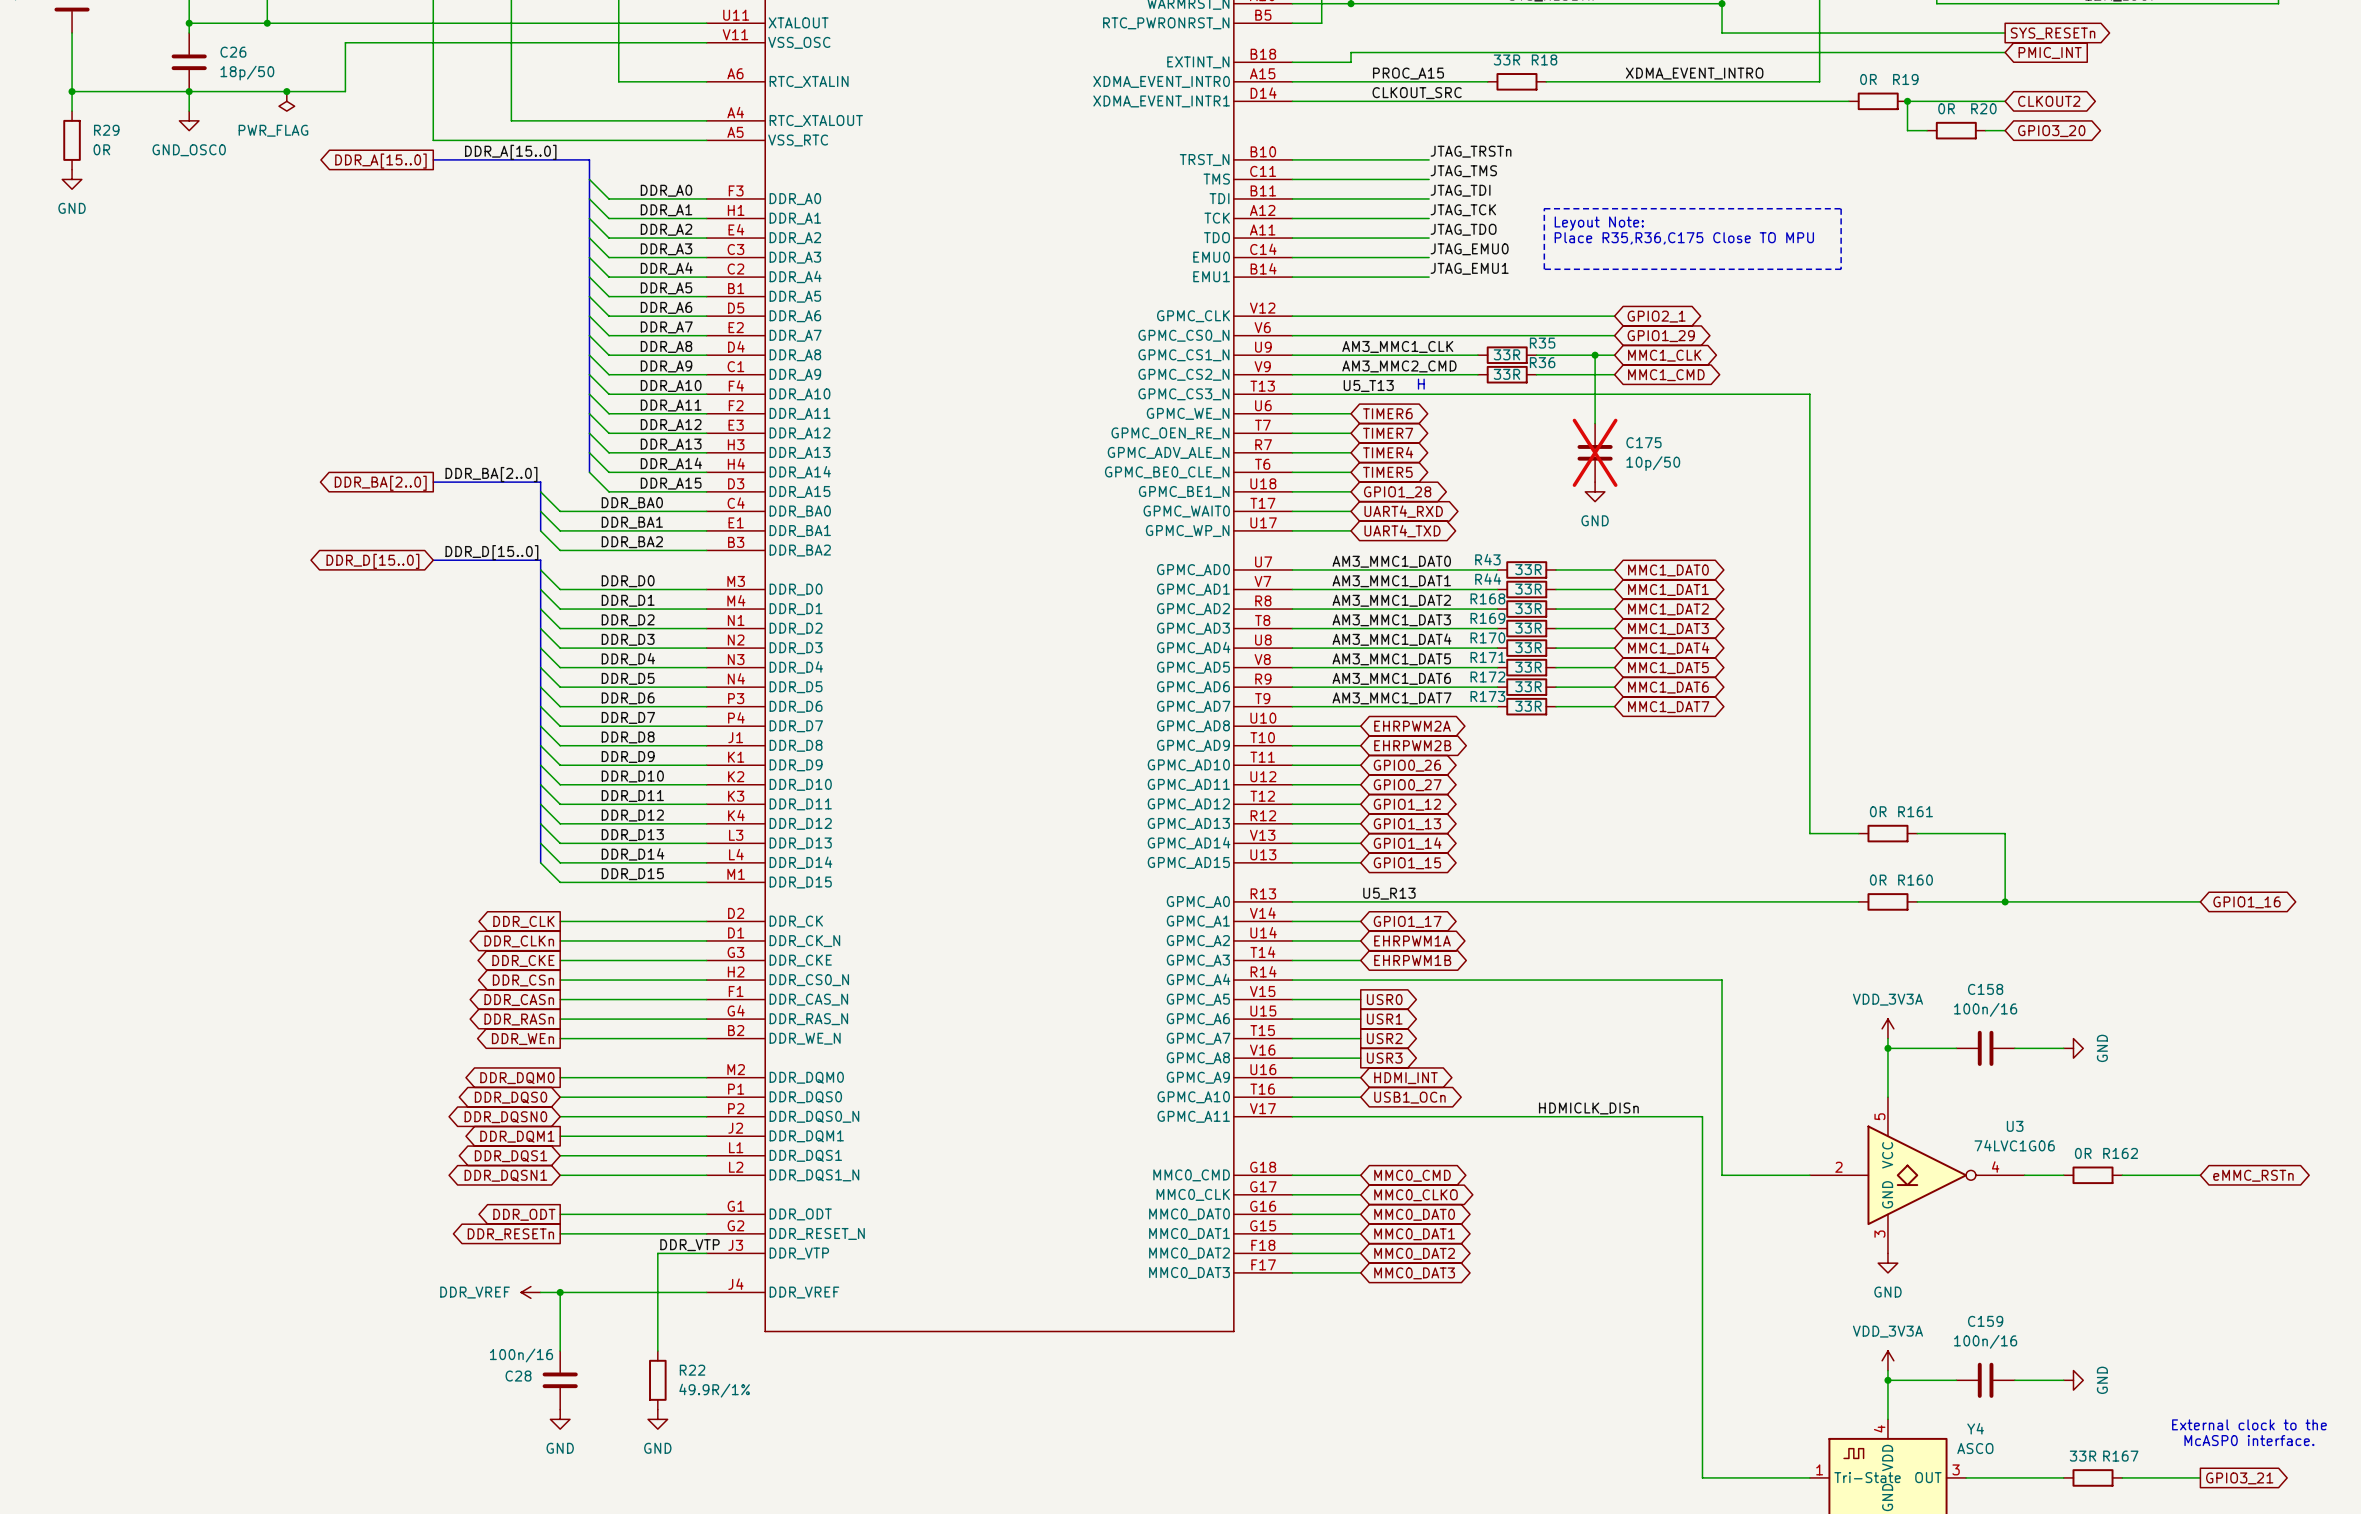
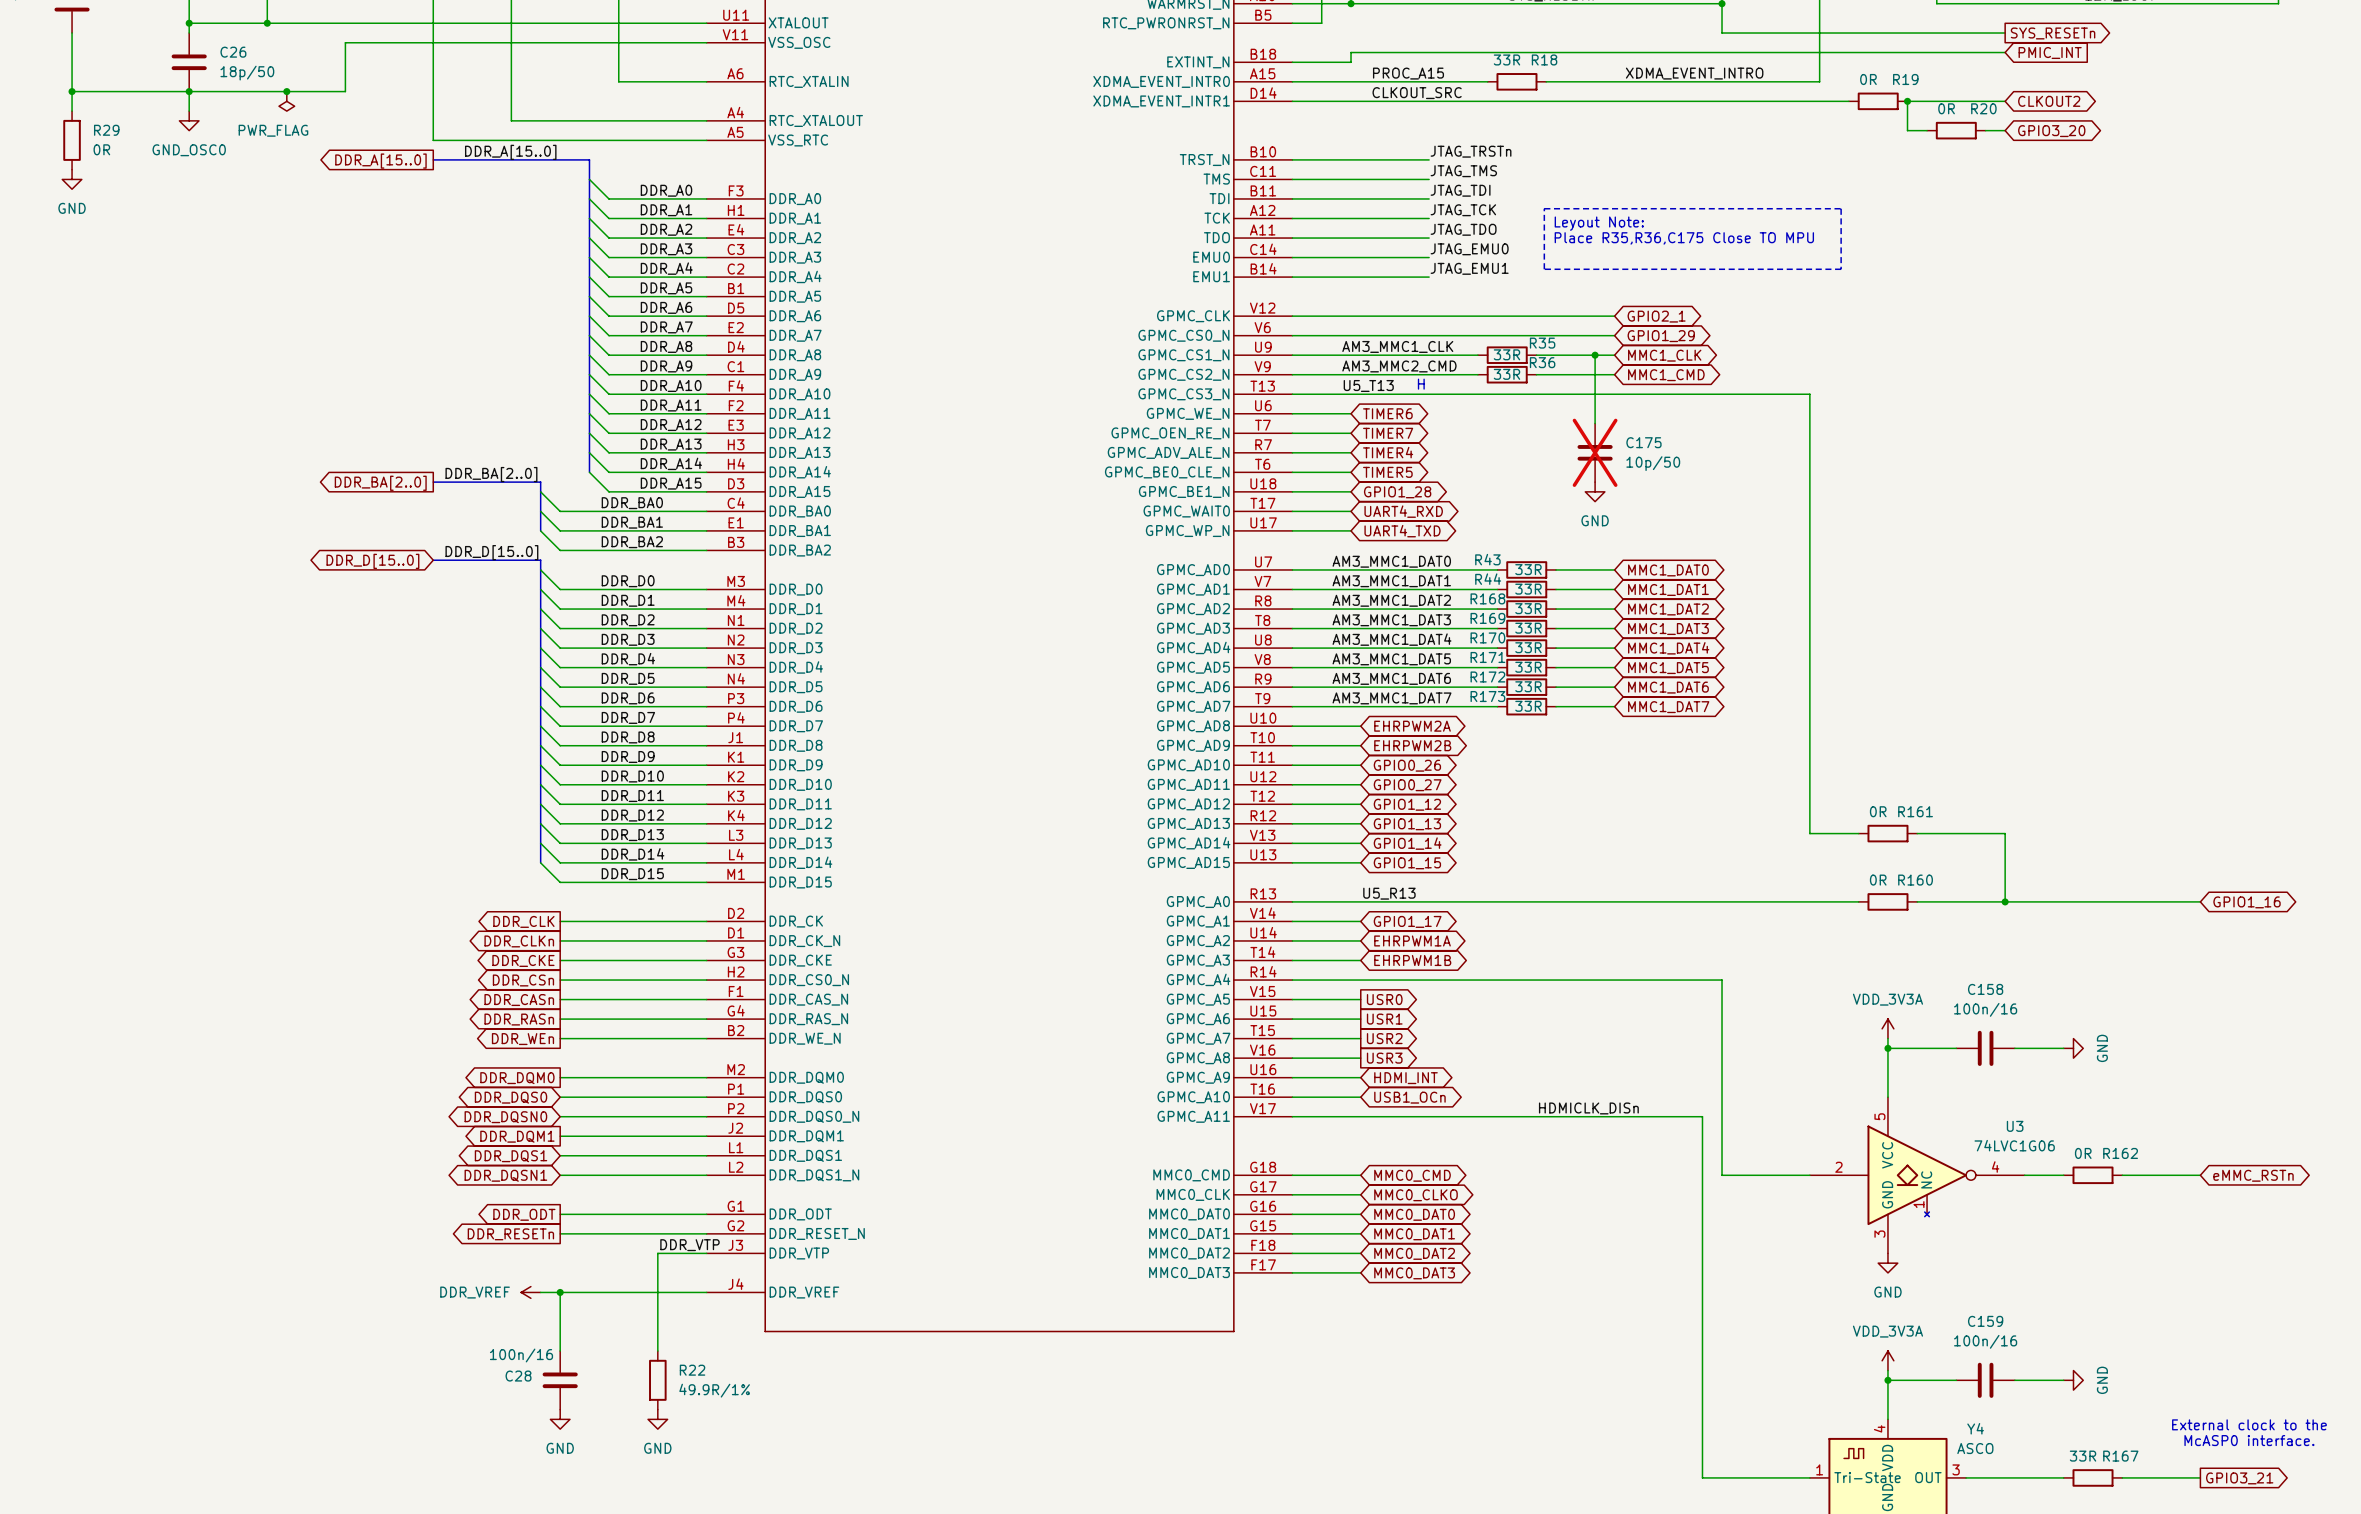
U3 symbol: [1809, 1097, 2025, 1254] -> [1809, 1097, 2025, 1254]

